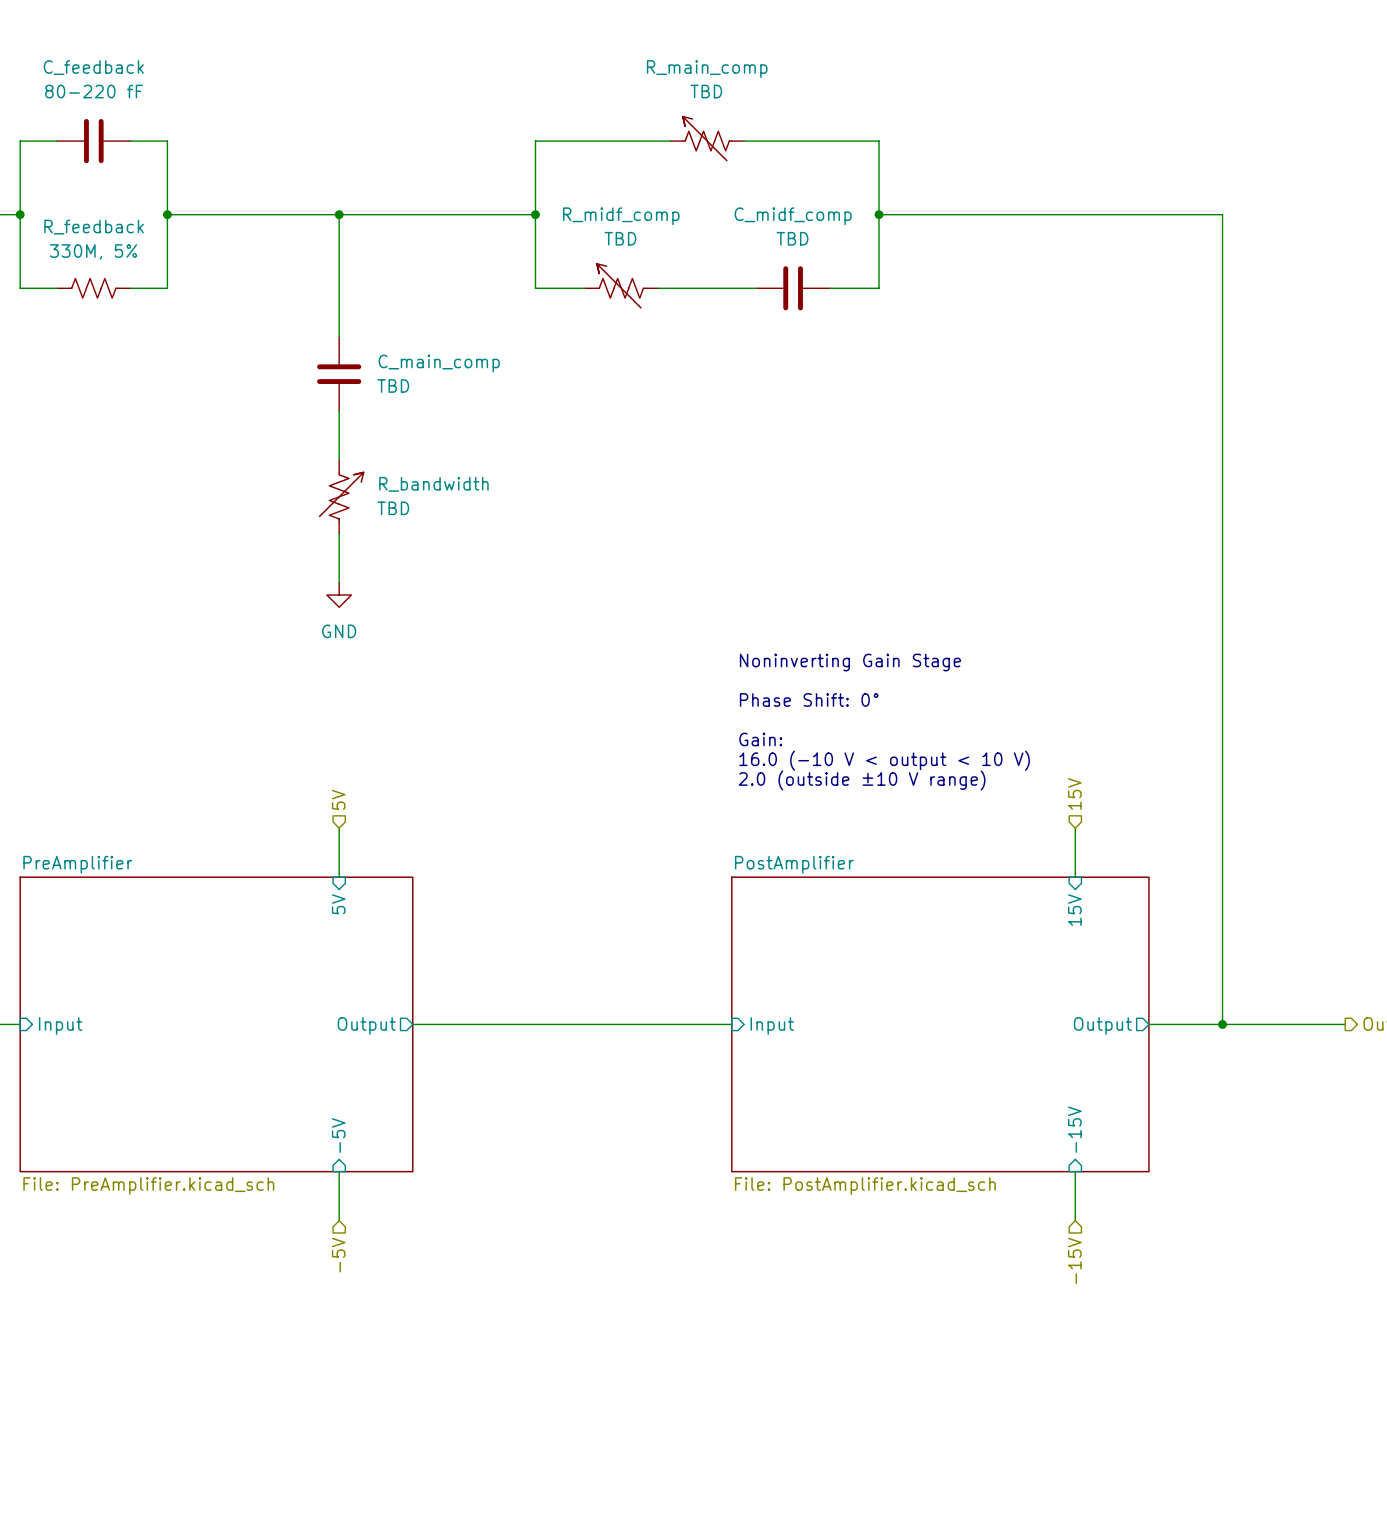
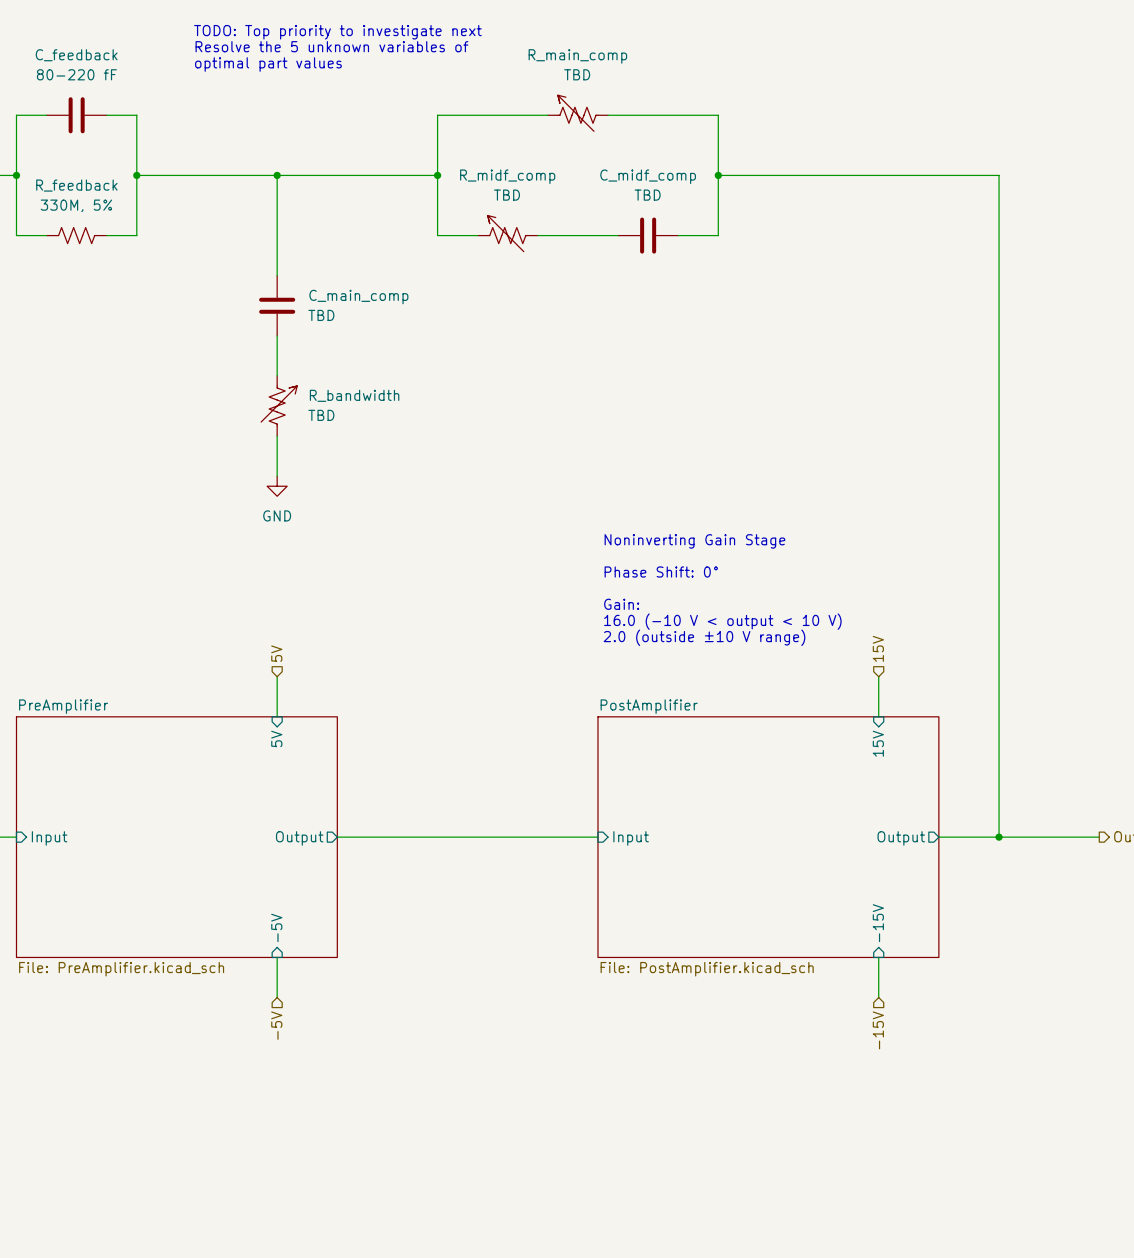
text: none -> TODO: Top priority to investigate next (337, 32)
text: none -> Resolve the 5 unknown variables of (331, 46)
text: none -> optimal part values (268, 64)

